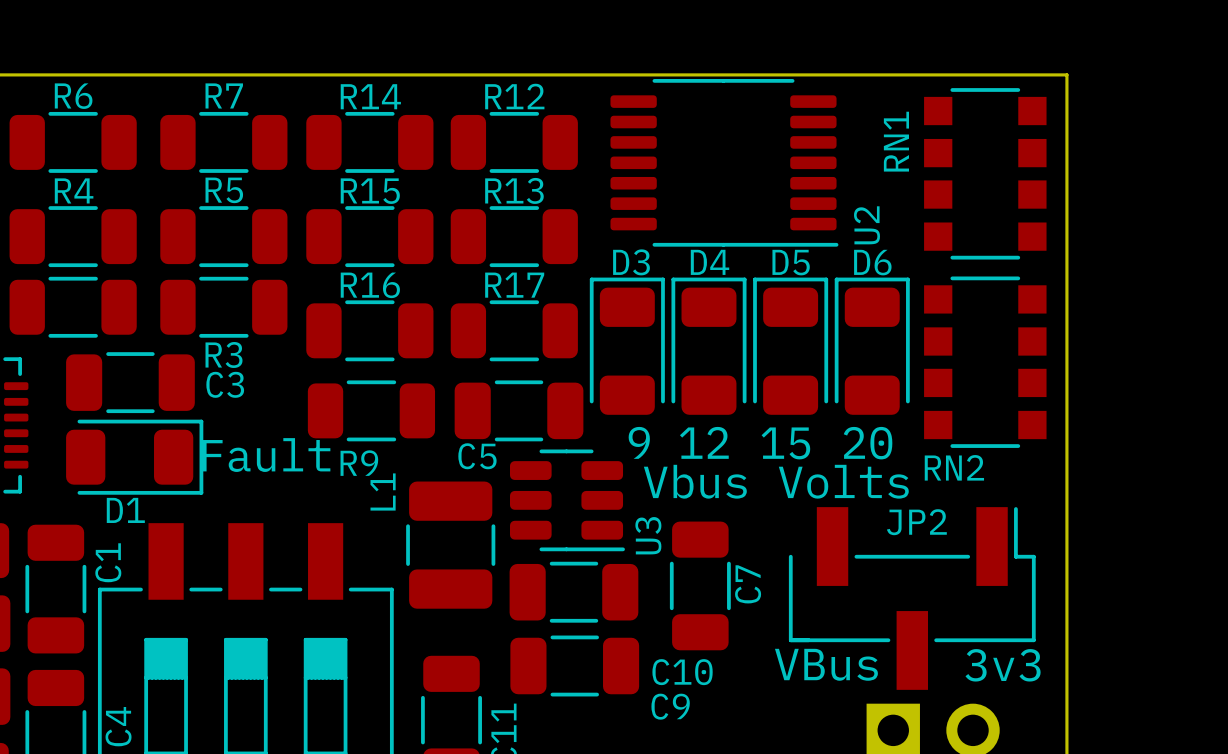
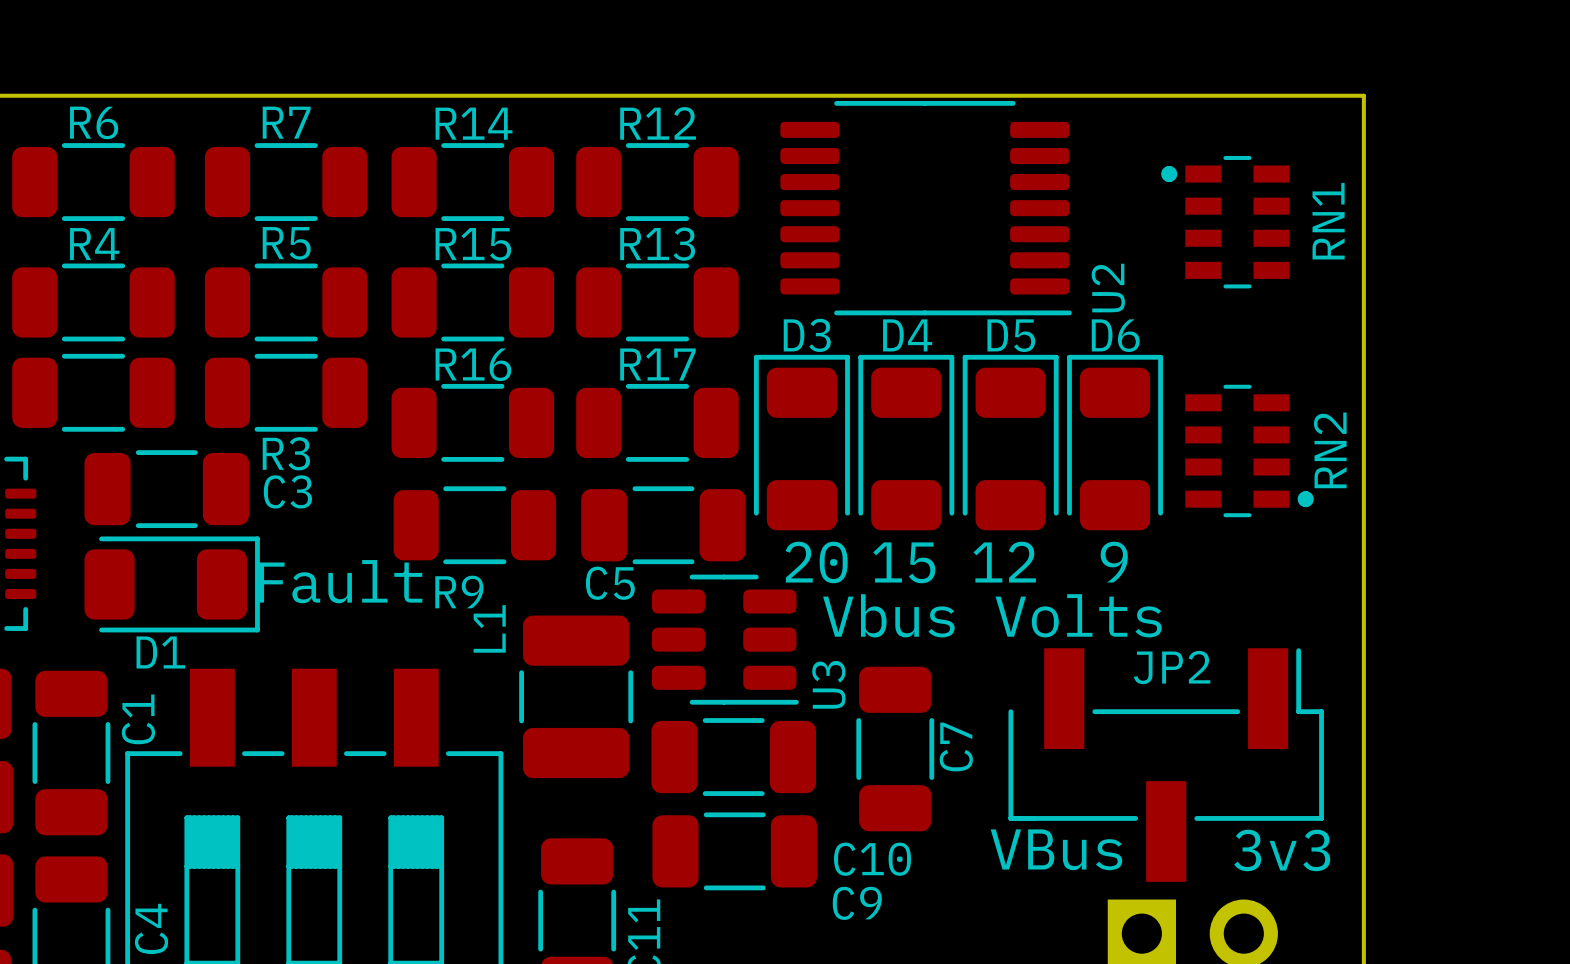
RN1 footprint: [924, 88, 1047, 260] -> [1161, 155, 1290, 289]
RN1 name position: RN1 (896, 141) -> RN1 (1328, 221)
RN2 footprint: [924, 276, 1047, 448] -> [1185, 384, 1314, 518]
text position: 9 (639, 442) -> 9 (1114, 562)
text: 12 (704, 442) -> 15 (904, 562)
text: 15 (785, 443) -> 12 (1004, 562)
text position: 20 (868, 443) -> 20 (816, 562)
RN2 name position: RN2 (954, 467) -> RN2 (1330, 450)

